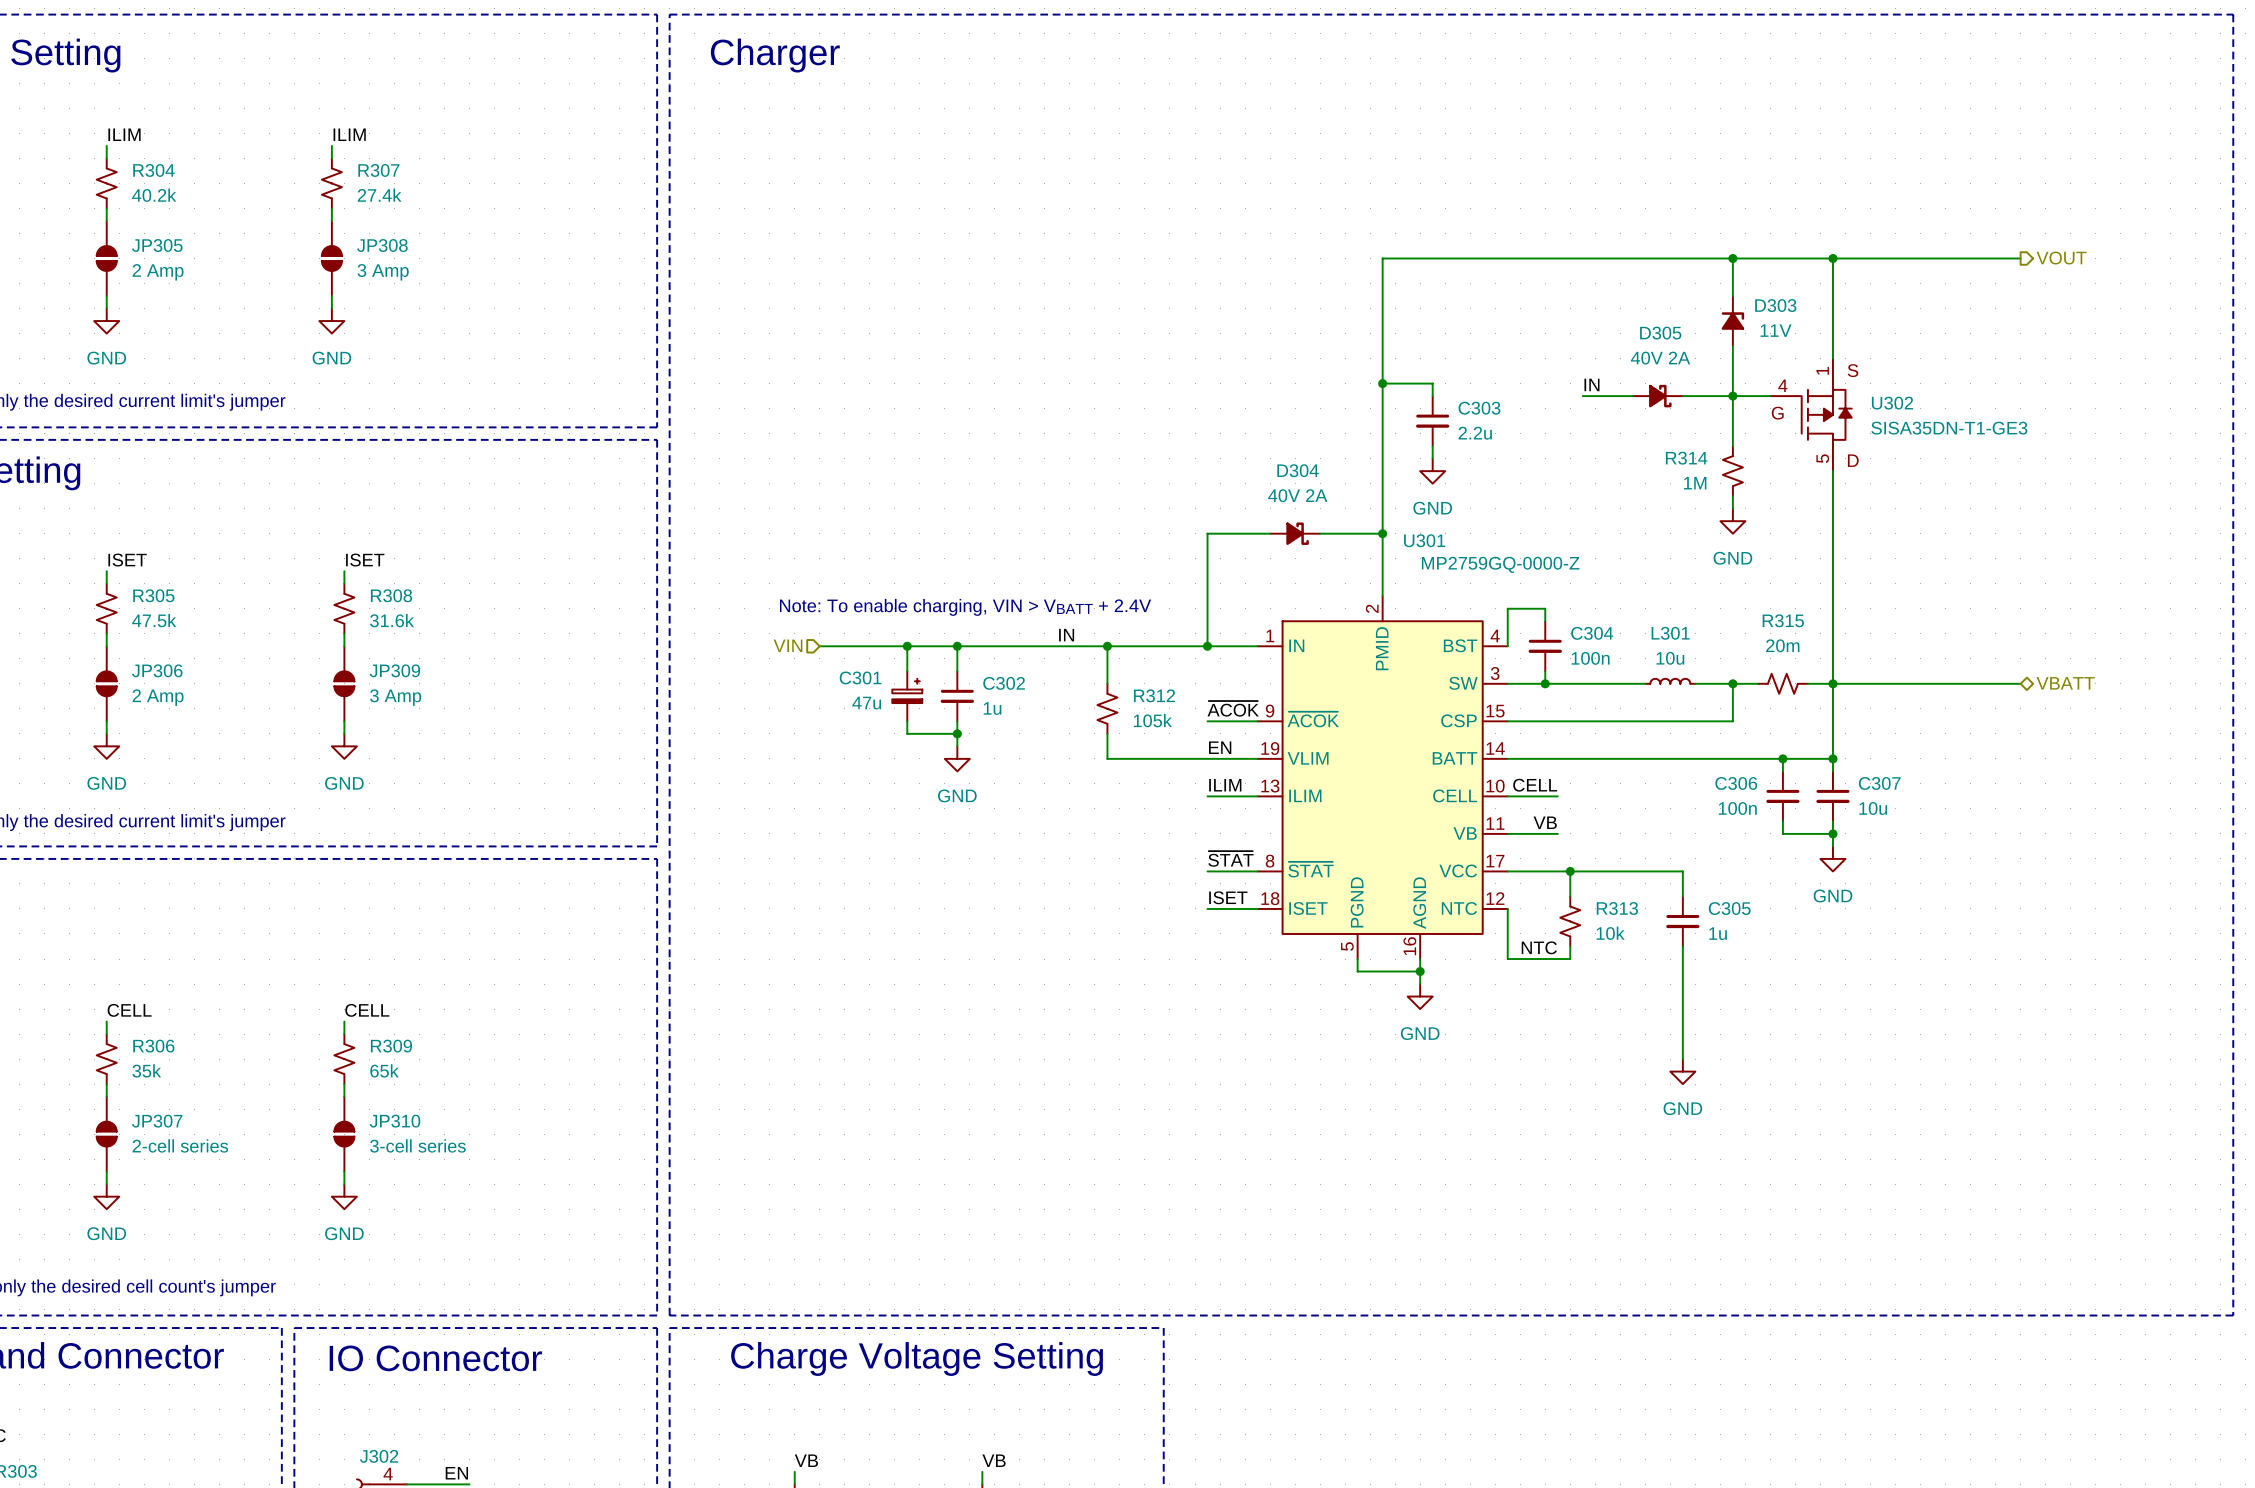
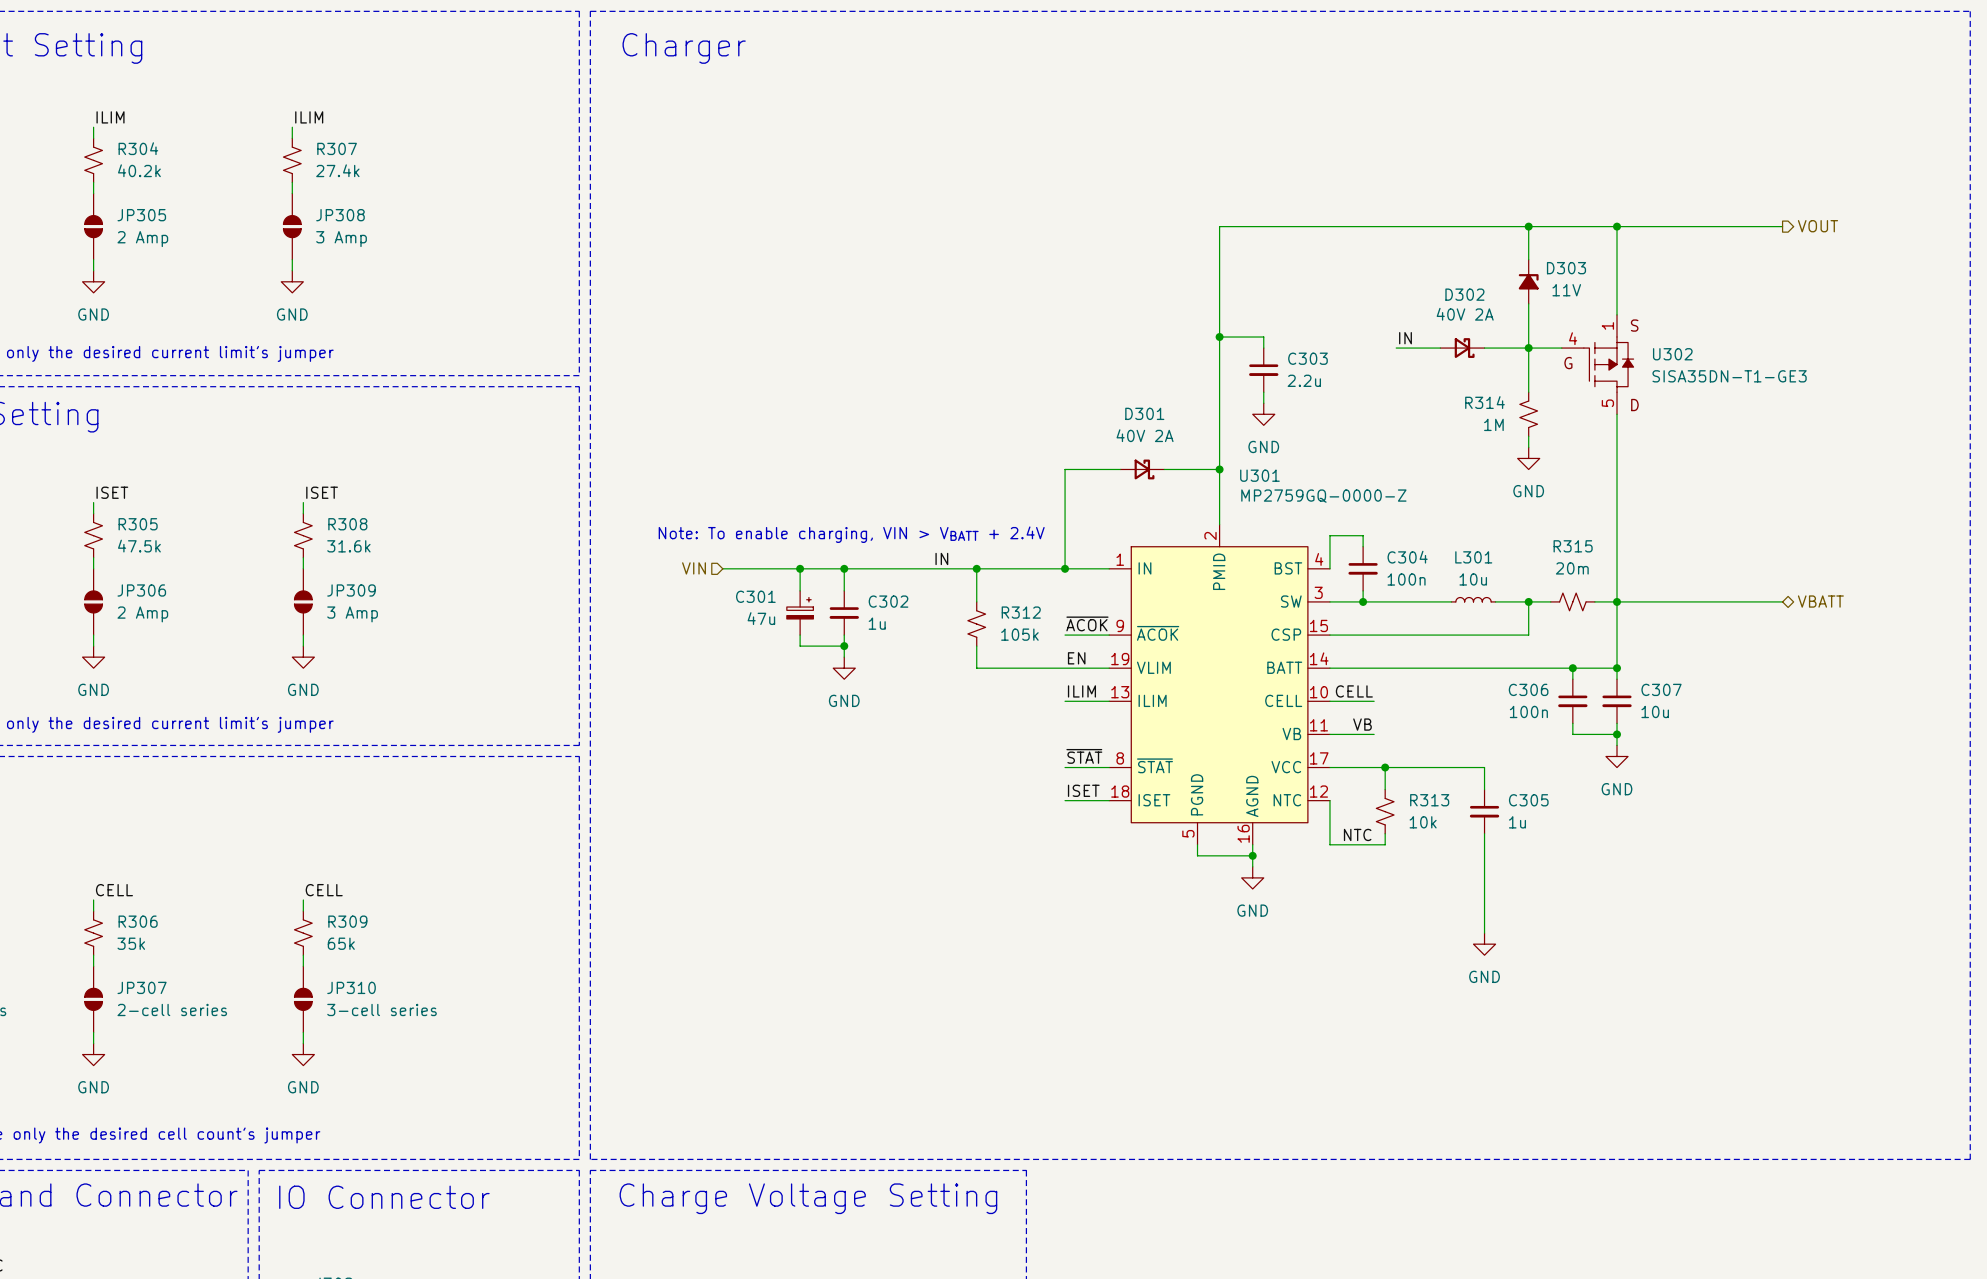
D305: 40V 2A (1657, 396) -> none
D302: none -> 40V 2A (1462, 348)
D304: 40V 2A (1295, 533) -> none
D301: none -> 40V 2A (1142, 469)

